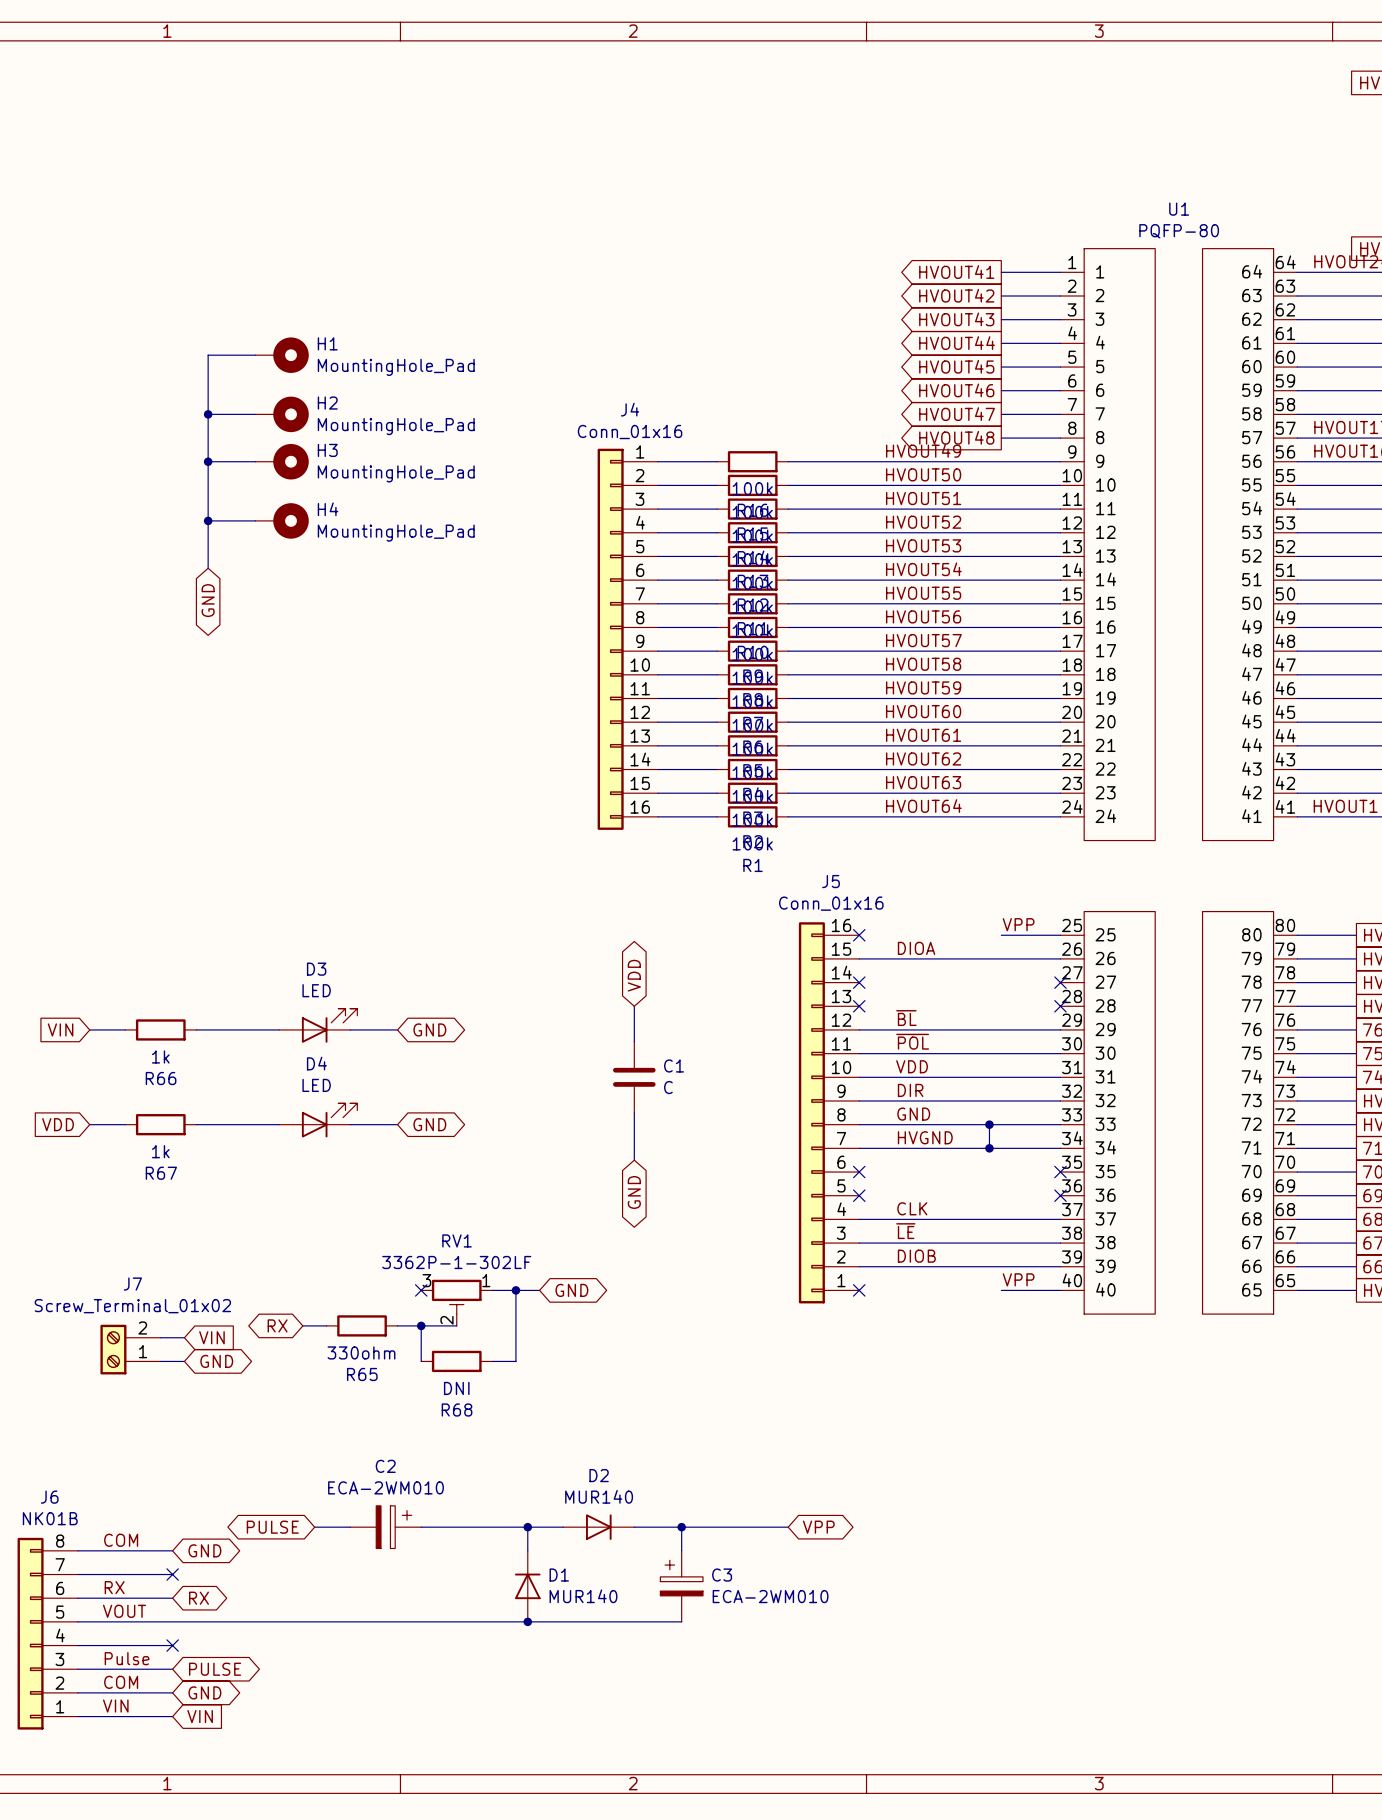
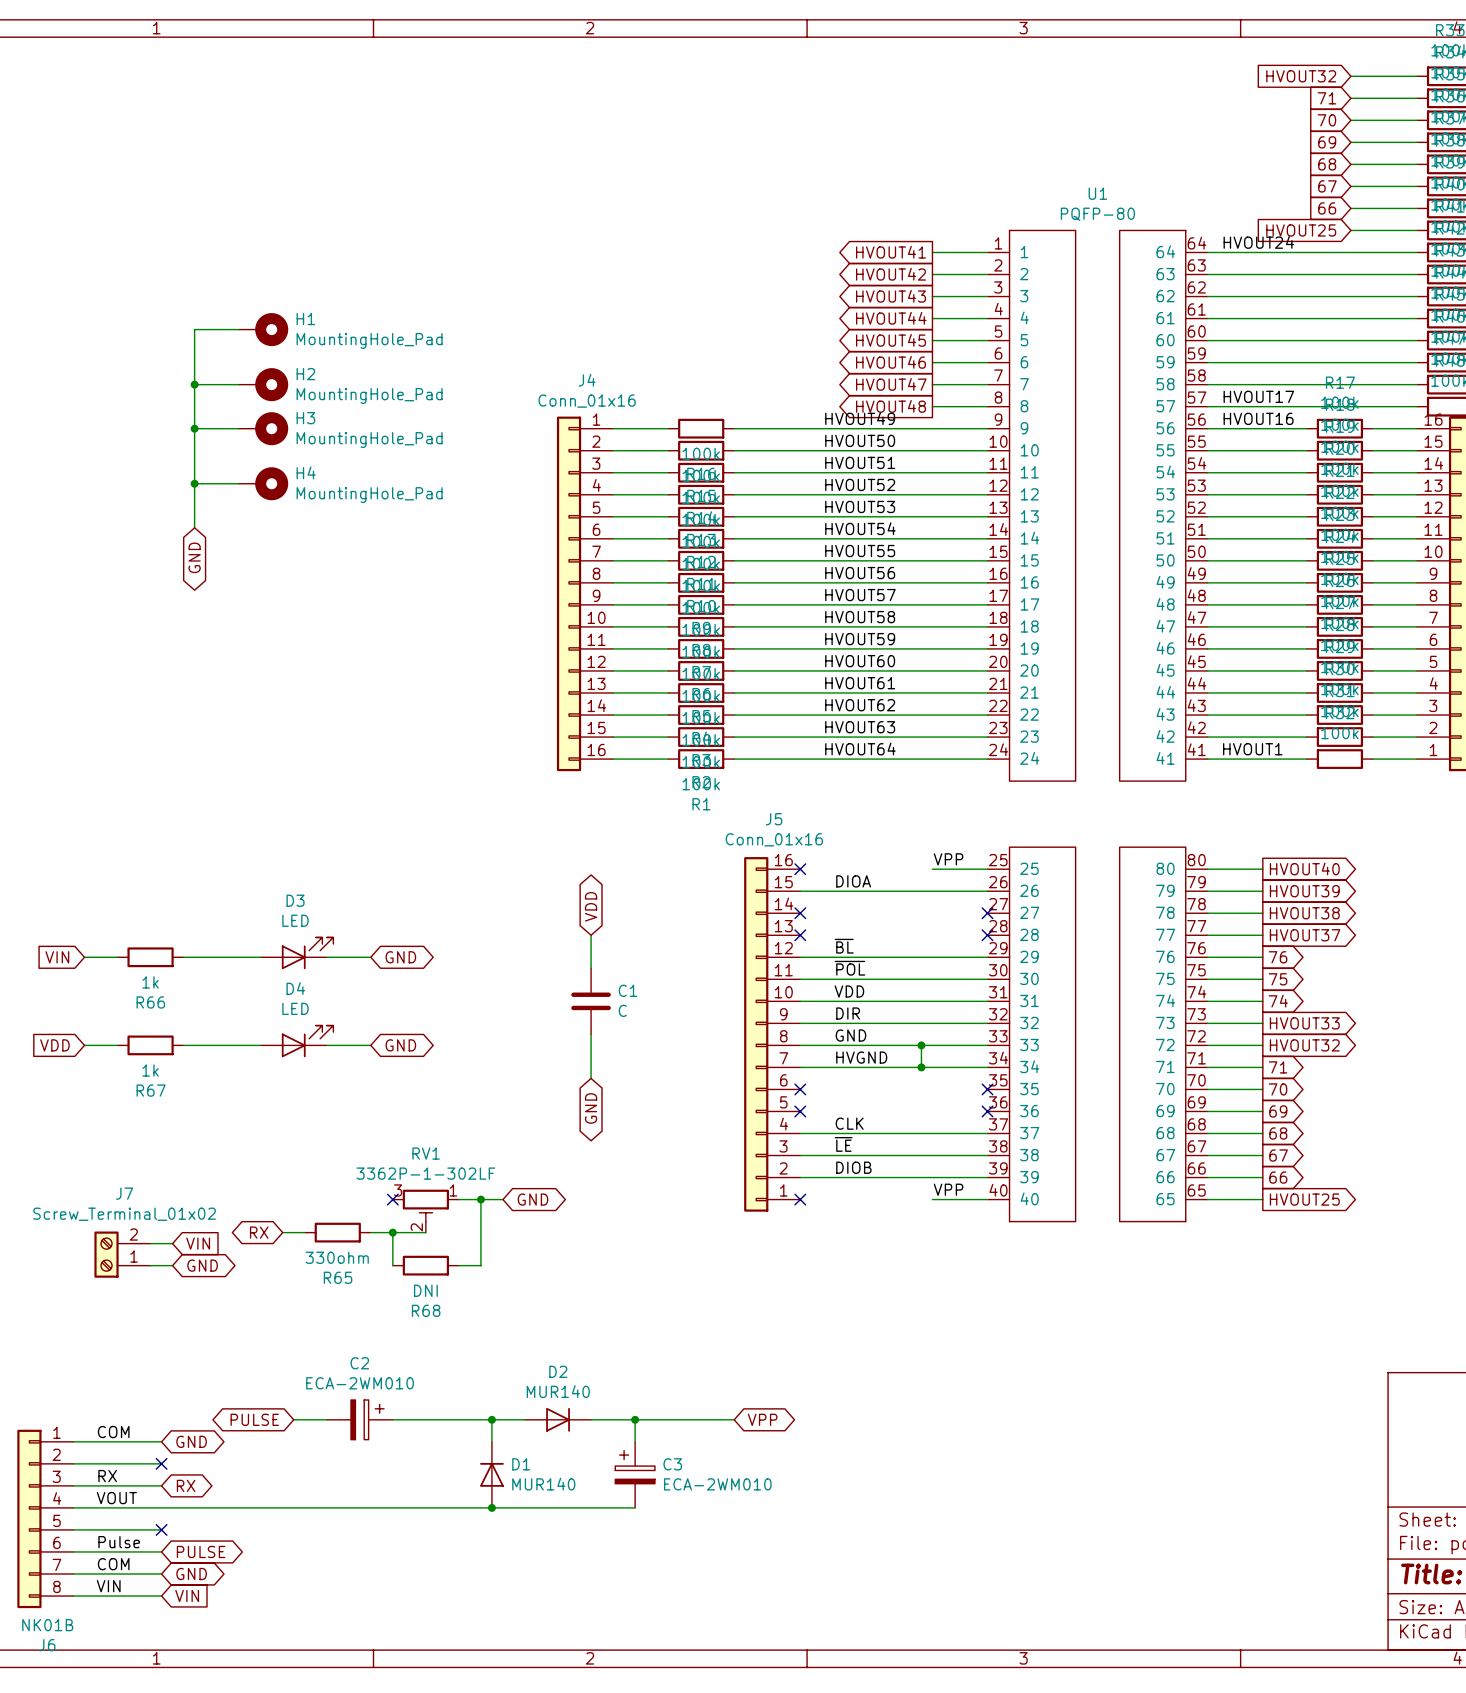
J6 flip: as is (30, 1633) -> up-down (29, 1518)

